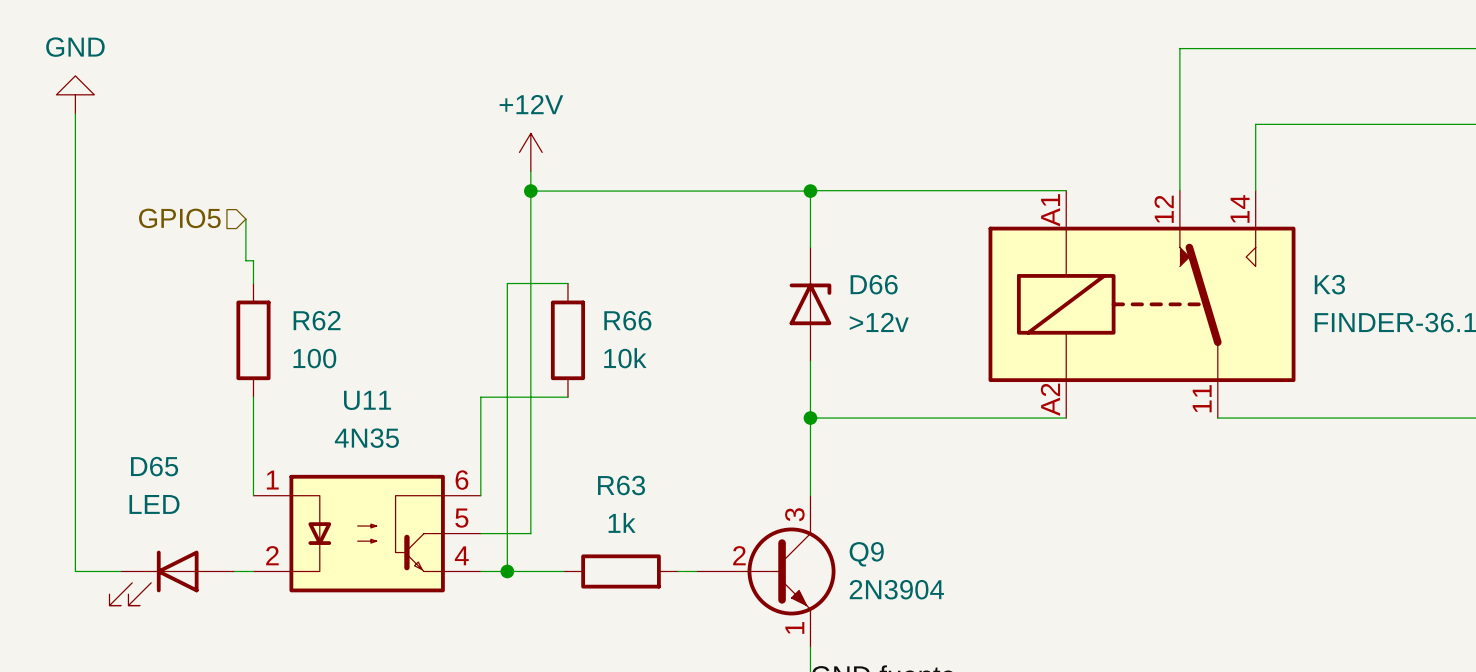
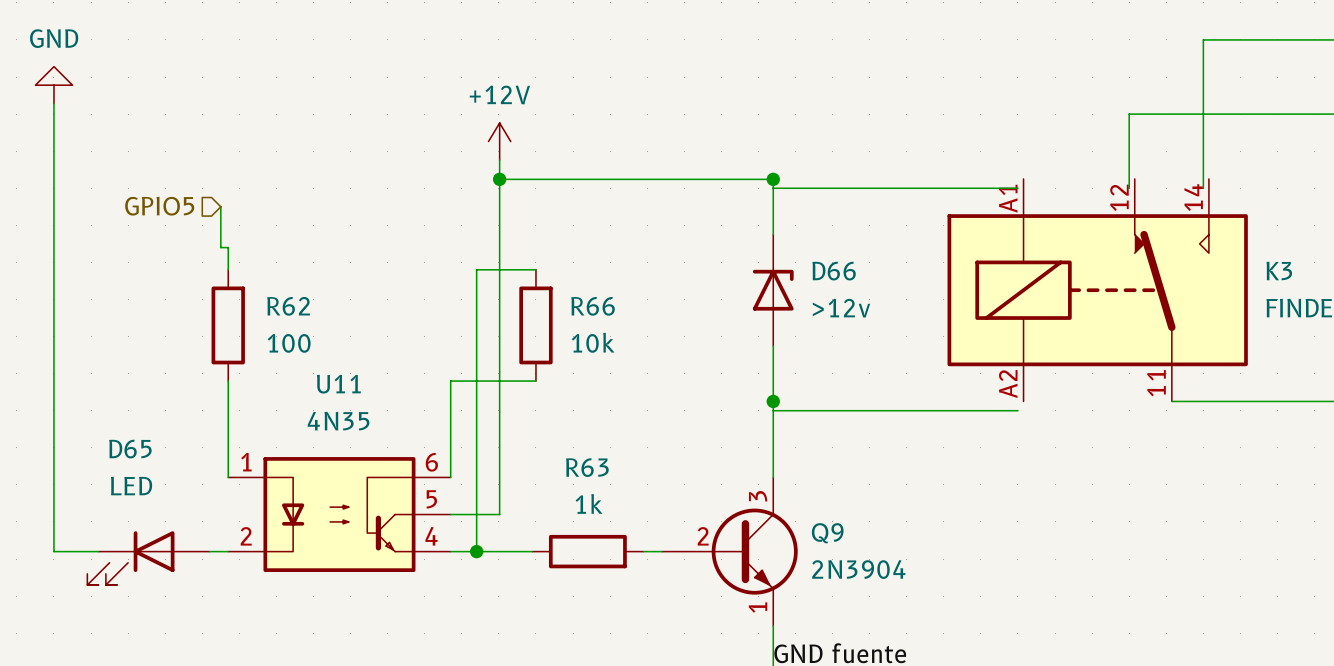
wire: (1250, 48) (1179, 48) (1179, 190) -> (1203, 39) (1203, 188)
wire: (1255, 124) (1255, 190) -> (1208, 114) (1129, 114) (1129, 188)
wire: (1066, 190) (810, 191) -> none
wire: none -> (773, 188) (1017, 188)
wire: (810, 418) (1066, 418) -> none
wire: none -> (773, 410) (1017, 410)

